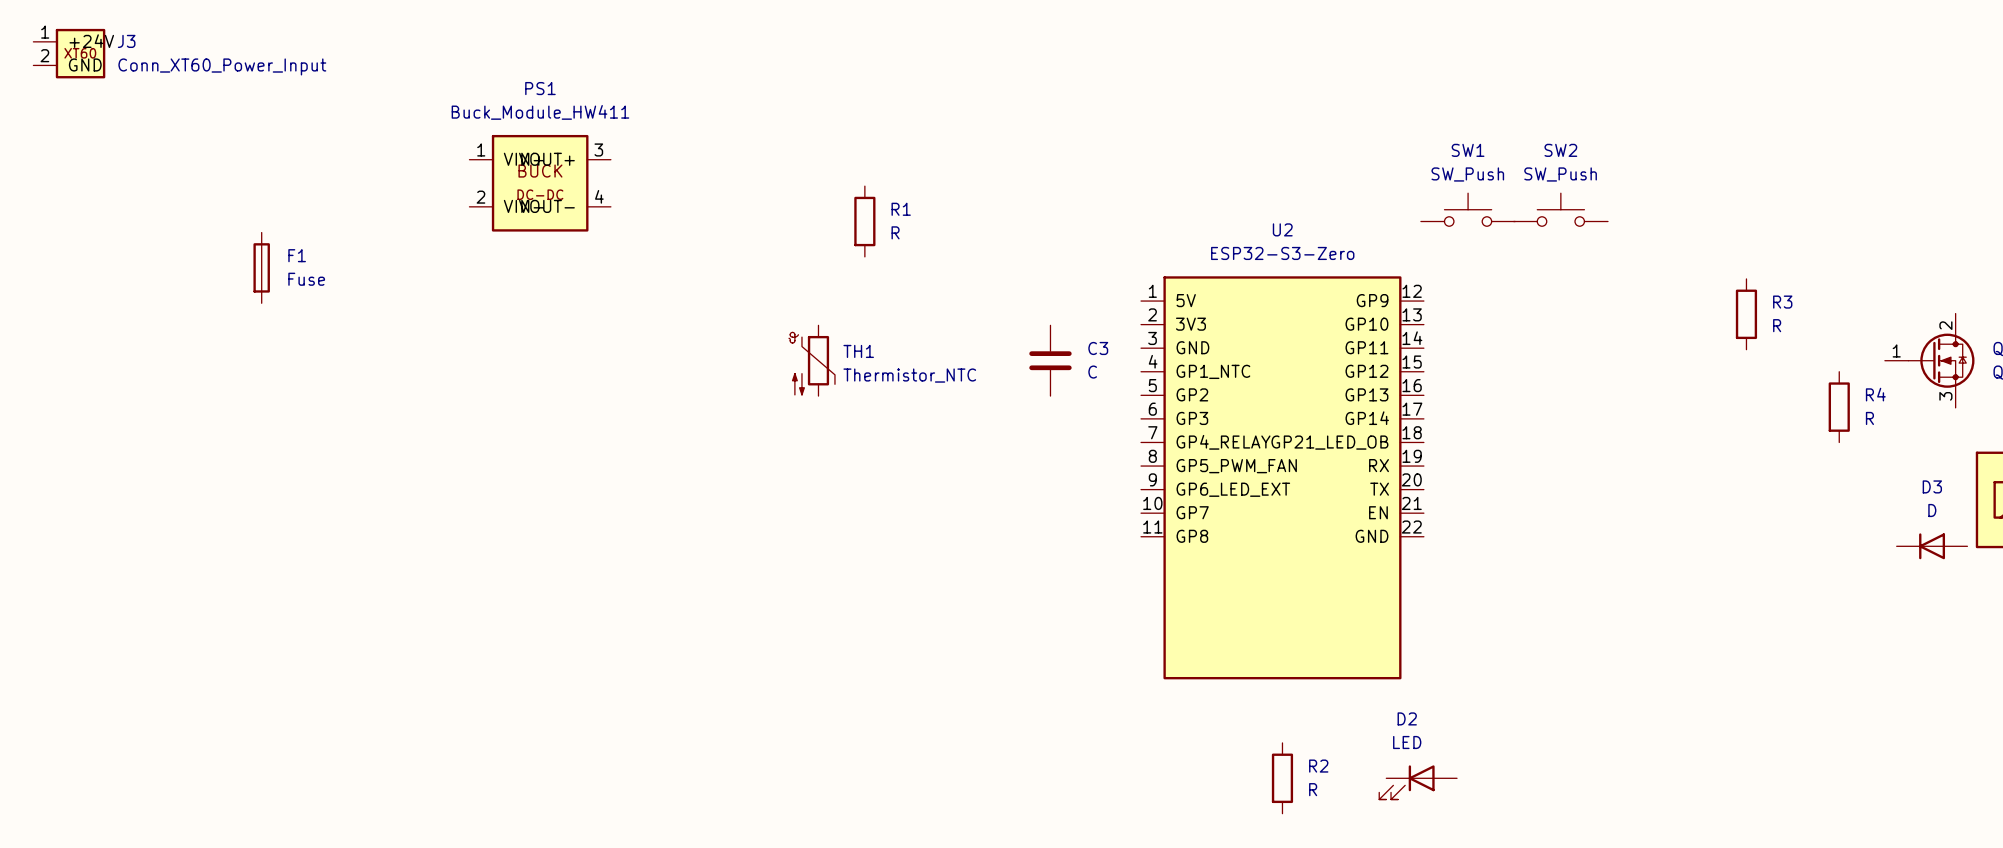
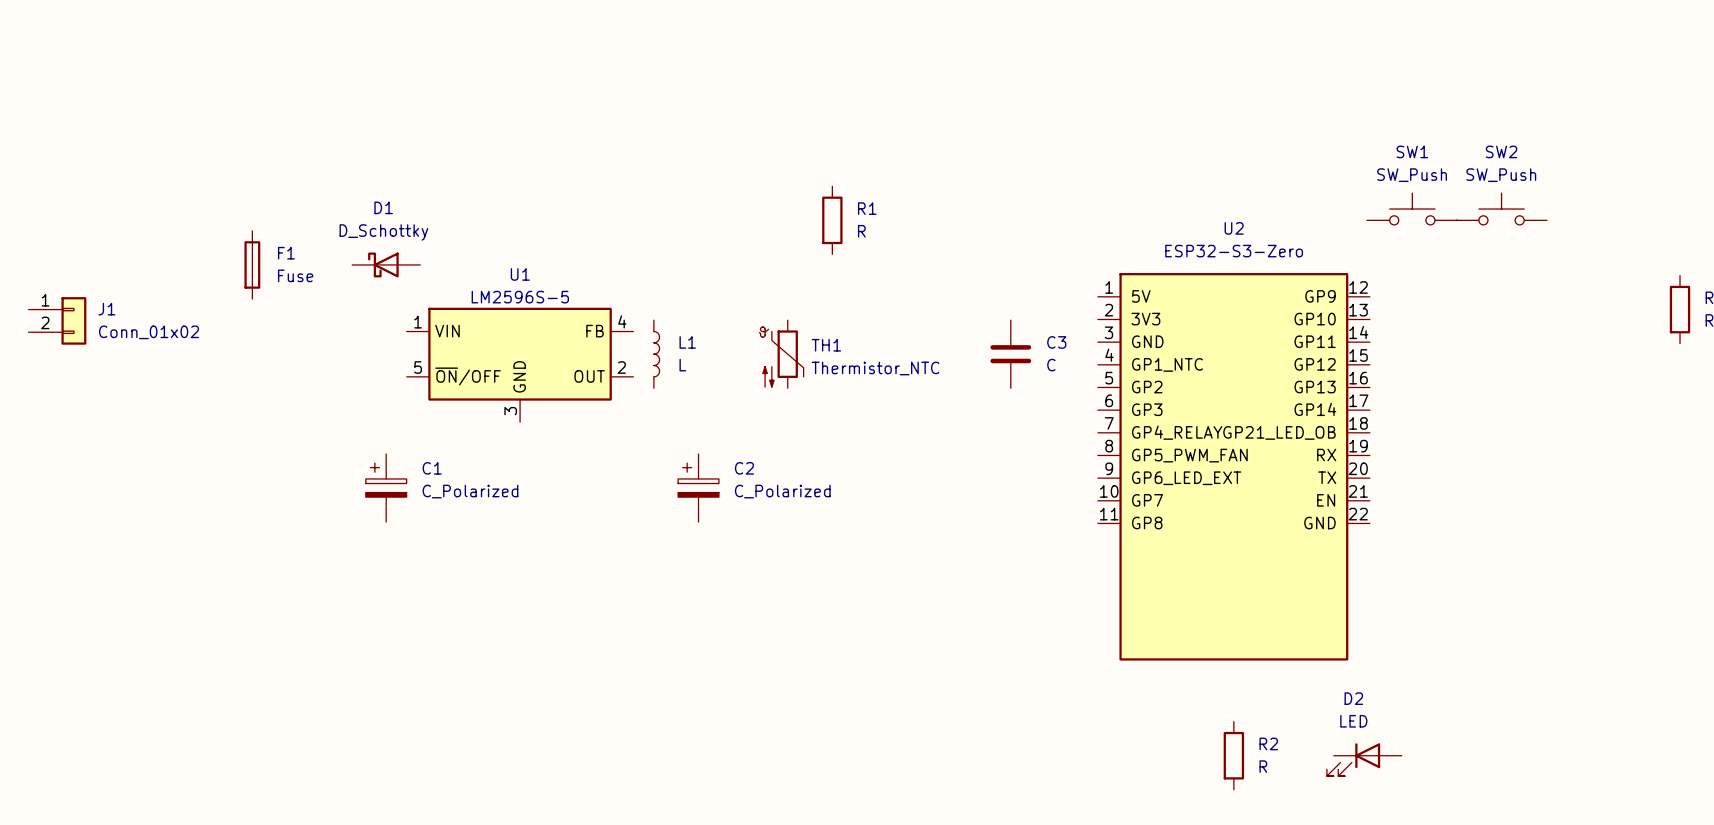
J3: Conn_XT60_Power_Input (69, 53) -> none
PS1: Buck_Module_HW411 (540, 183) -> none
D1: none -> D_Schottky (386, 264)
J1: none -> Conn_01x02 (57, 320)
L1: none -> L (656, 354)
U1: none -> LM2596S-5 (520, 364)
C1: none -> C_Polarized (386, 488)
C2: none -> C_Polarized (698, 488)

